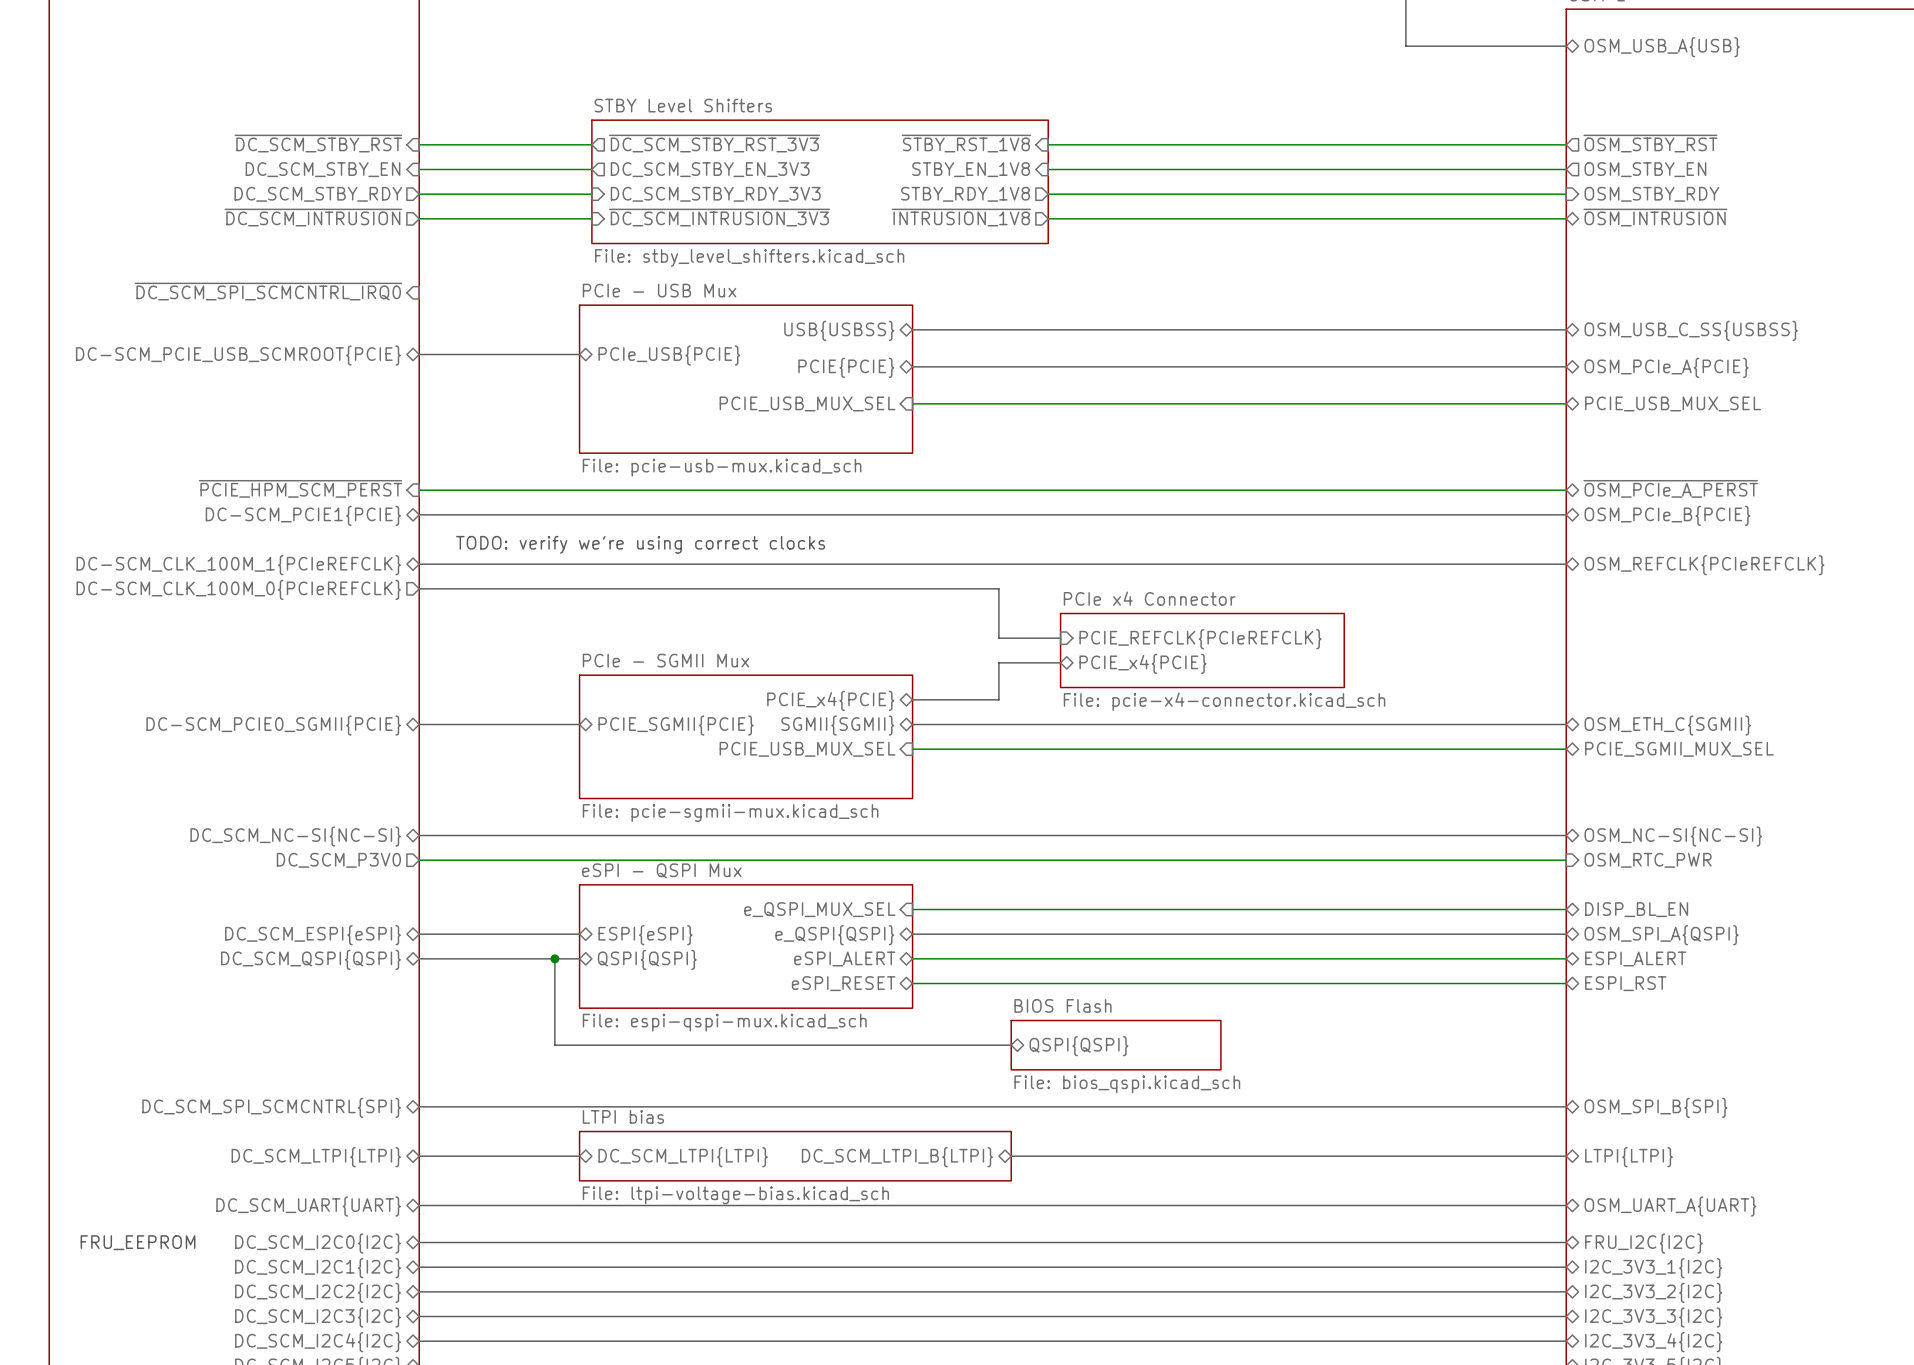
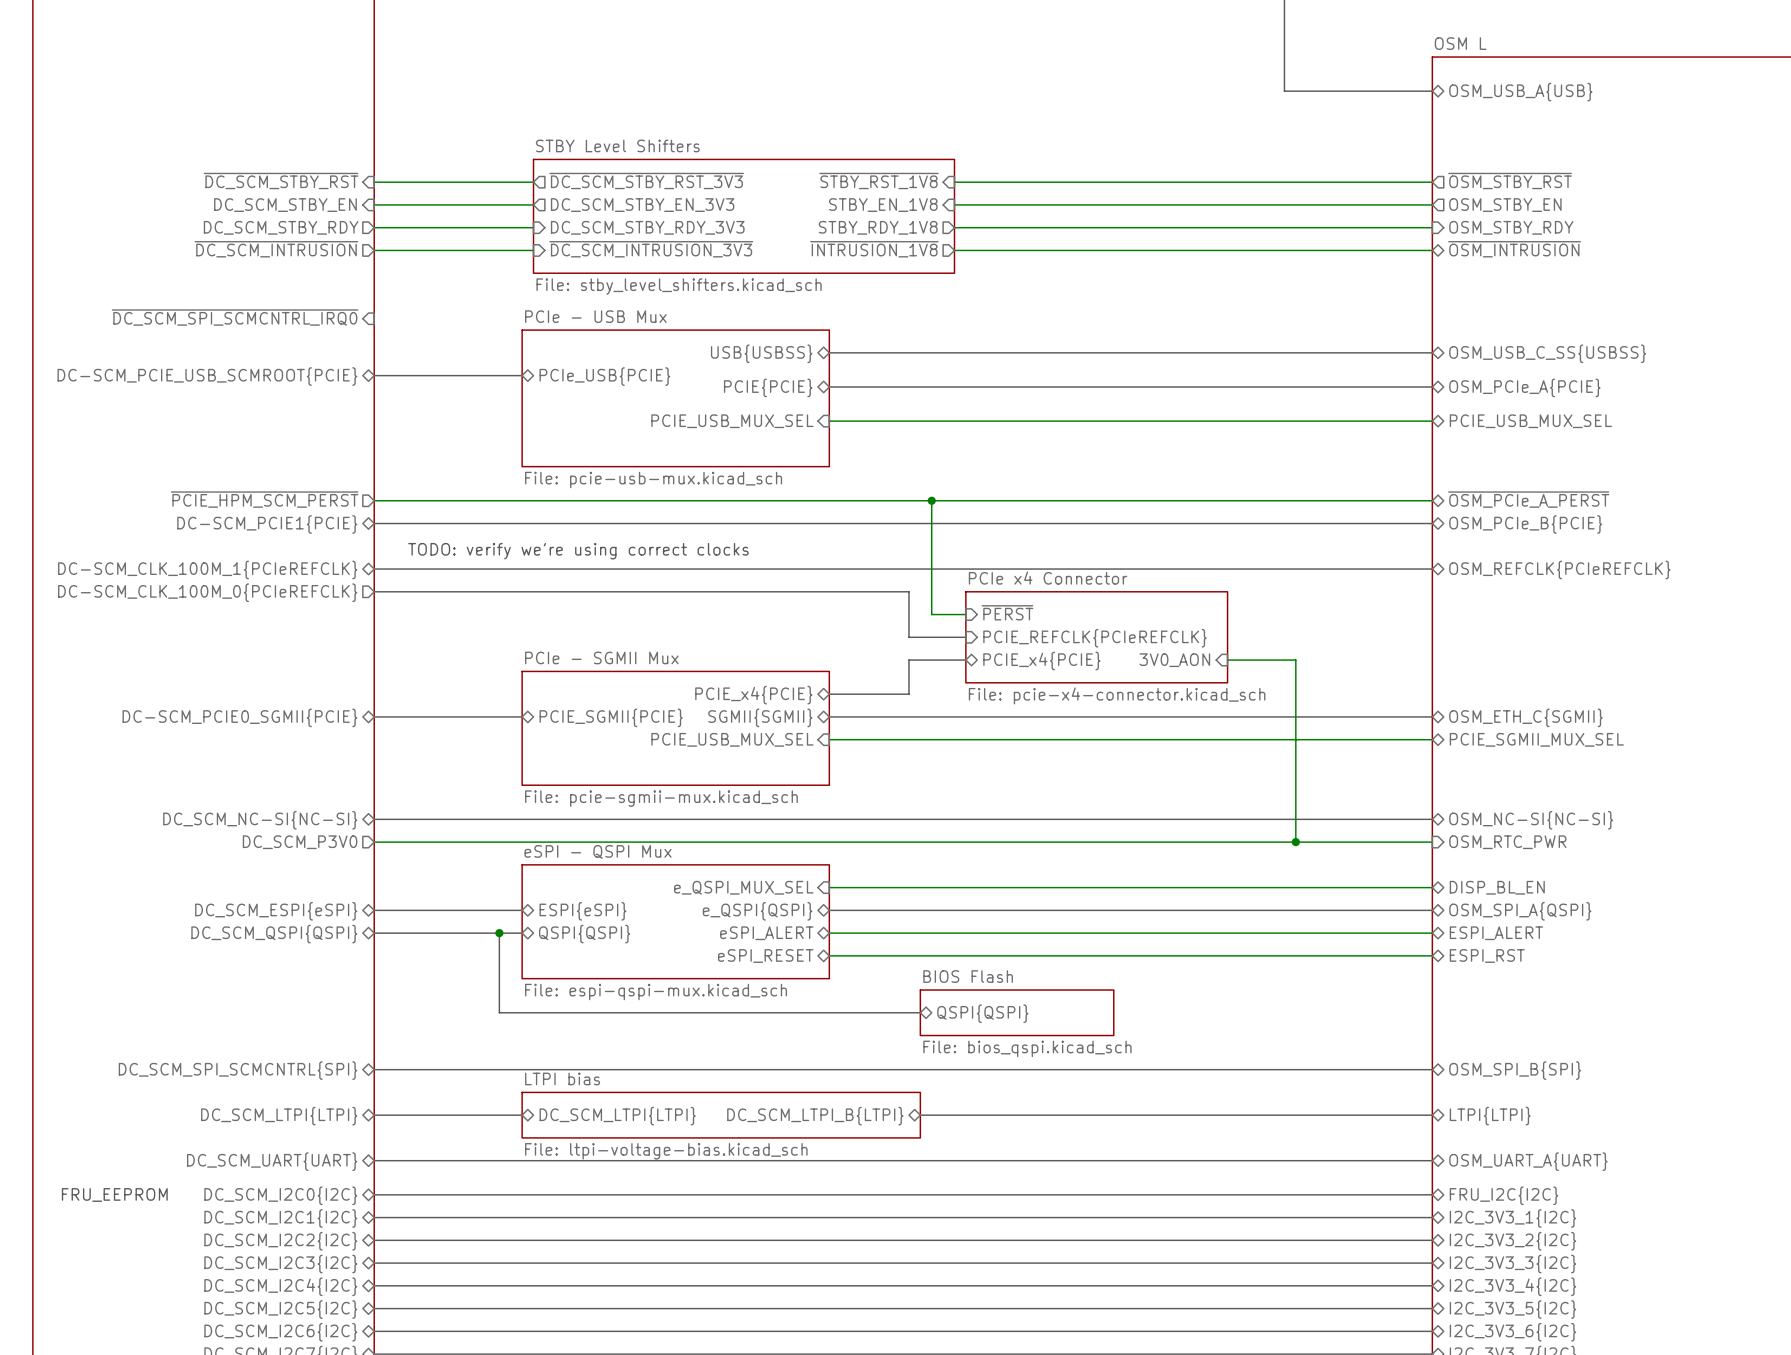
sheet pin shape: input (300, 488) -> output (264, 499)
wire: none -> (931, 500) (931, 614) (965, 614)
junction: none -> (931, 500)
sheet pin: none -> ~{PERST} (1007, 612)
sheet PCIe x4 Connector shape: [1059, 612, 1345, 689] -> [965, 591, 1229, 684]
sheet pin: none -> 3V0_AON (1174, 660)
wire: none -> (1227, 660) (1295, 660) (1295, 842)
junction: none -> (1295, 842)

